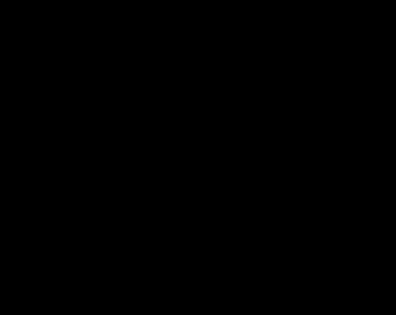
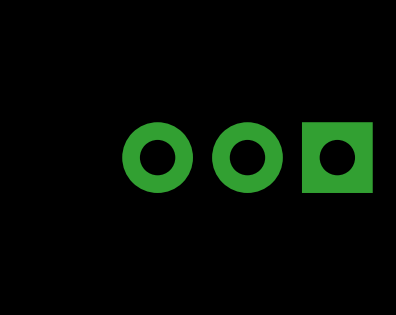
part: none -> (247, 157)

